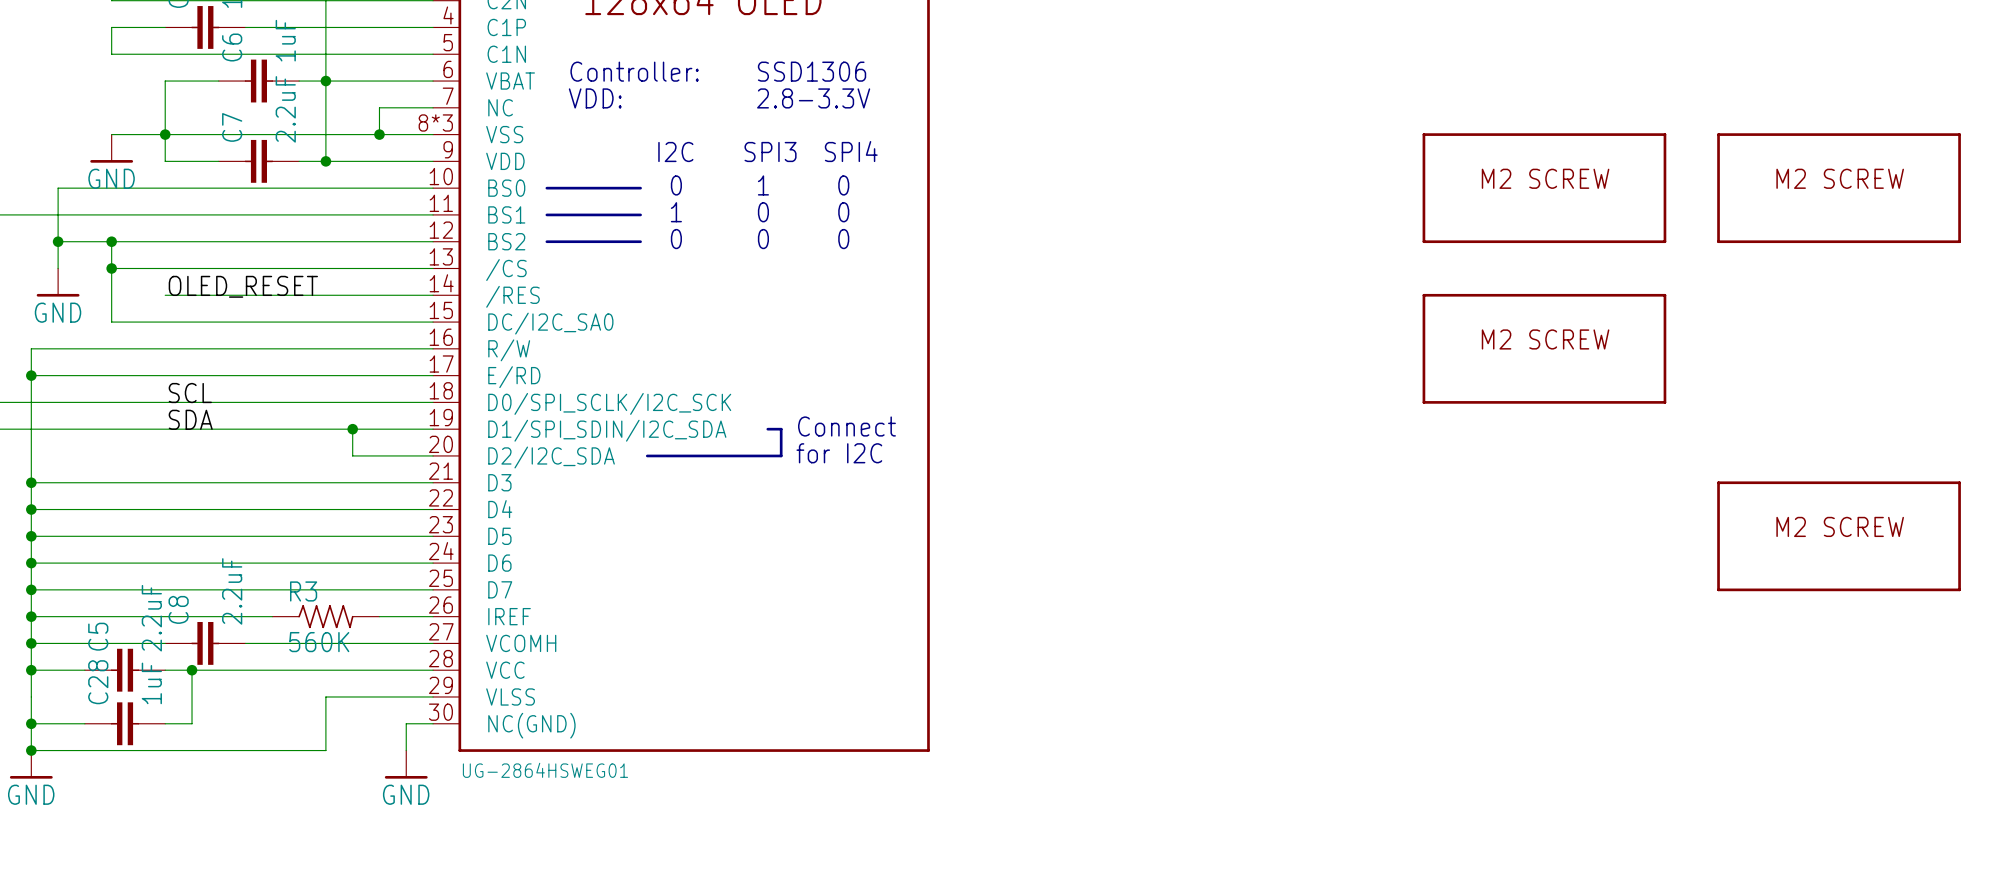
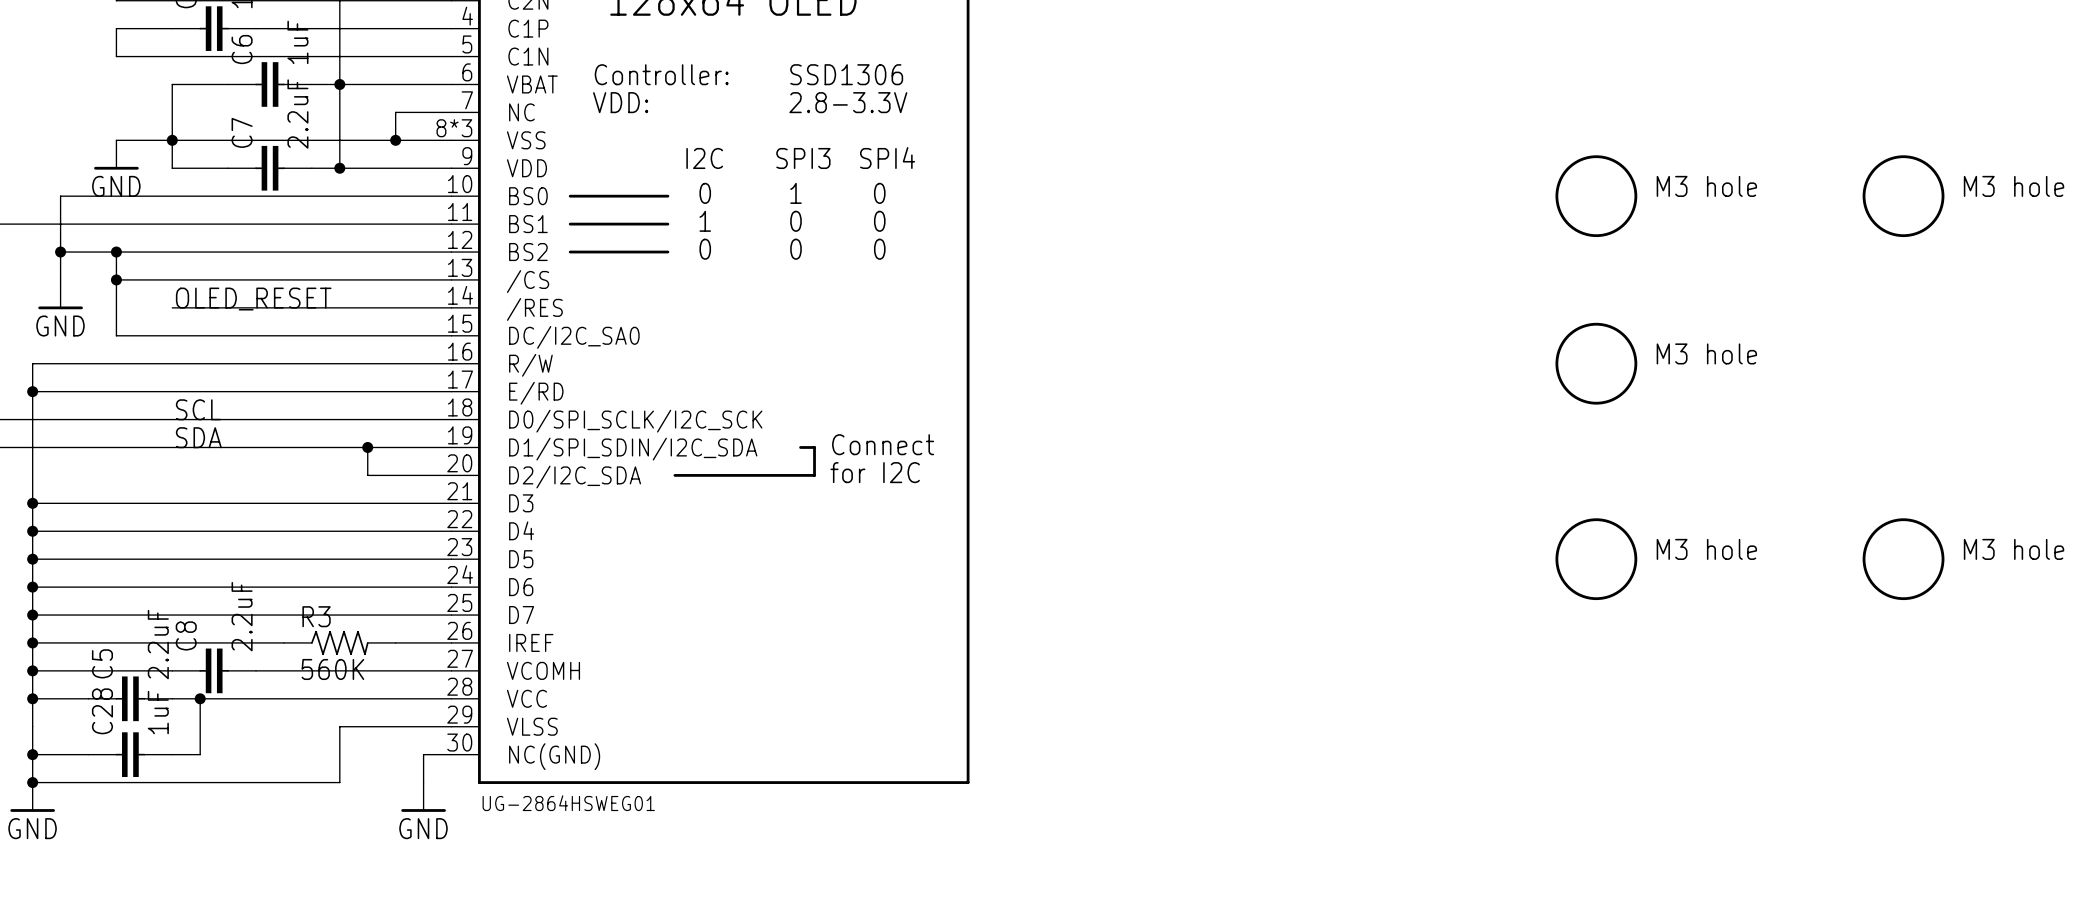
part: none -> (1596, 196)
part: (1544, 188) -> none
part: none -> (1903, 196)
part: (1839, 188) -> none
part: none -> (1596, 363)
part: (1544, 348) -> none
part: none -> (1596, 559)
part: none -> (1903, 559)
part: (1839, 536) -> none

